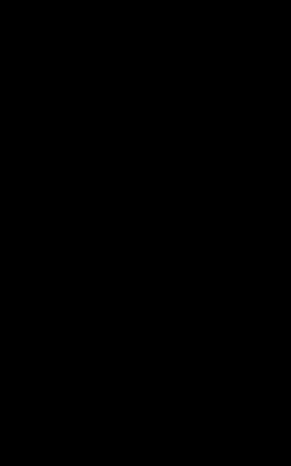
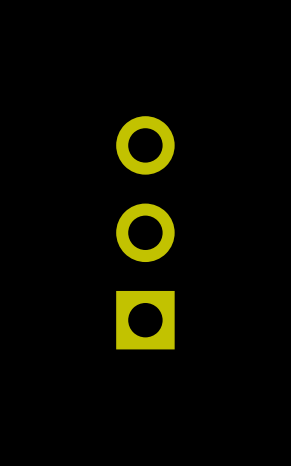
part: none -> (145, 232)

